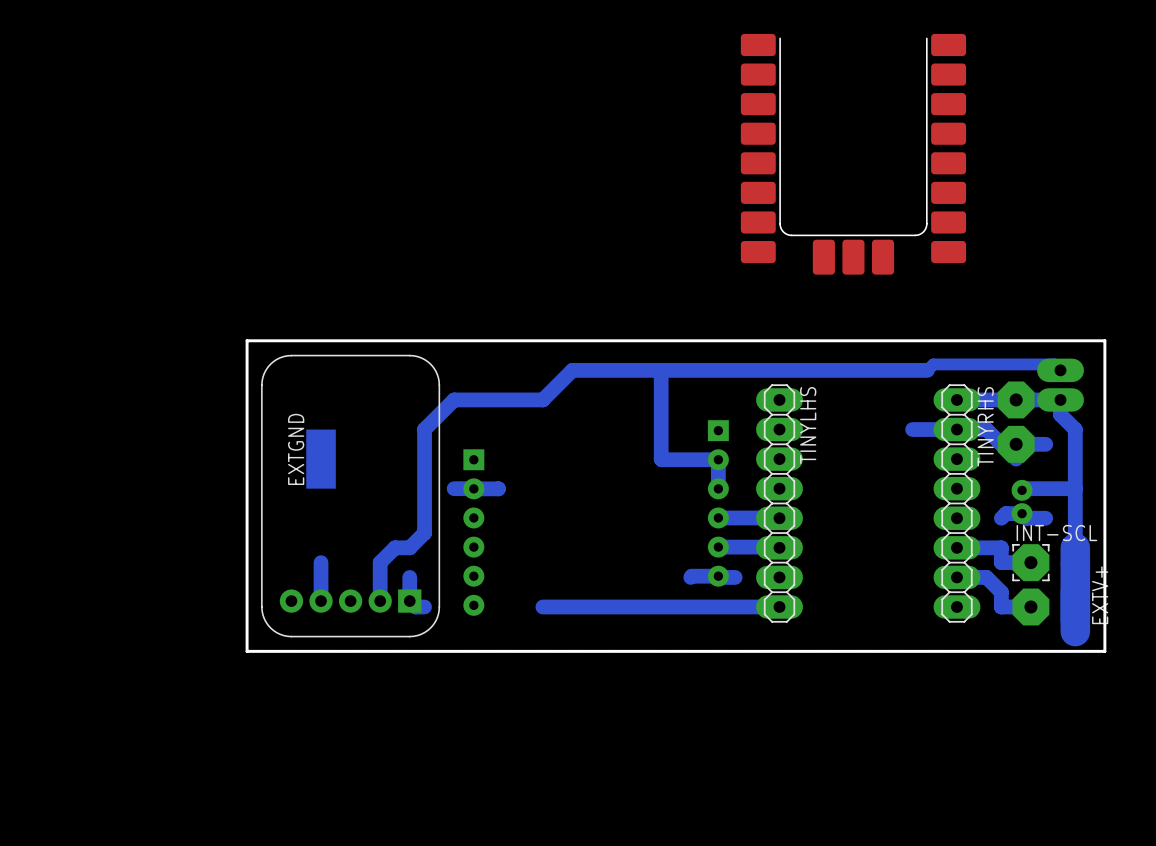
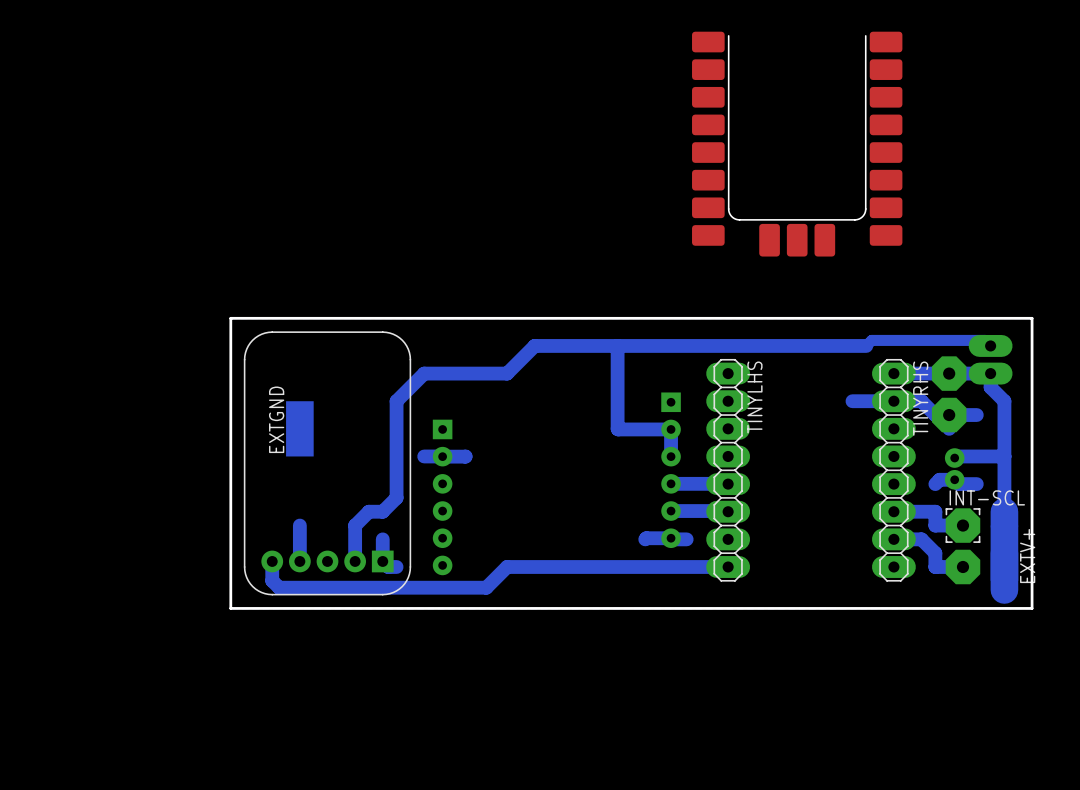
bottom track: none -> (272, 561) (272, 580) (279, 587) (486, 587) (507, 566)

